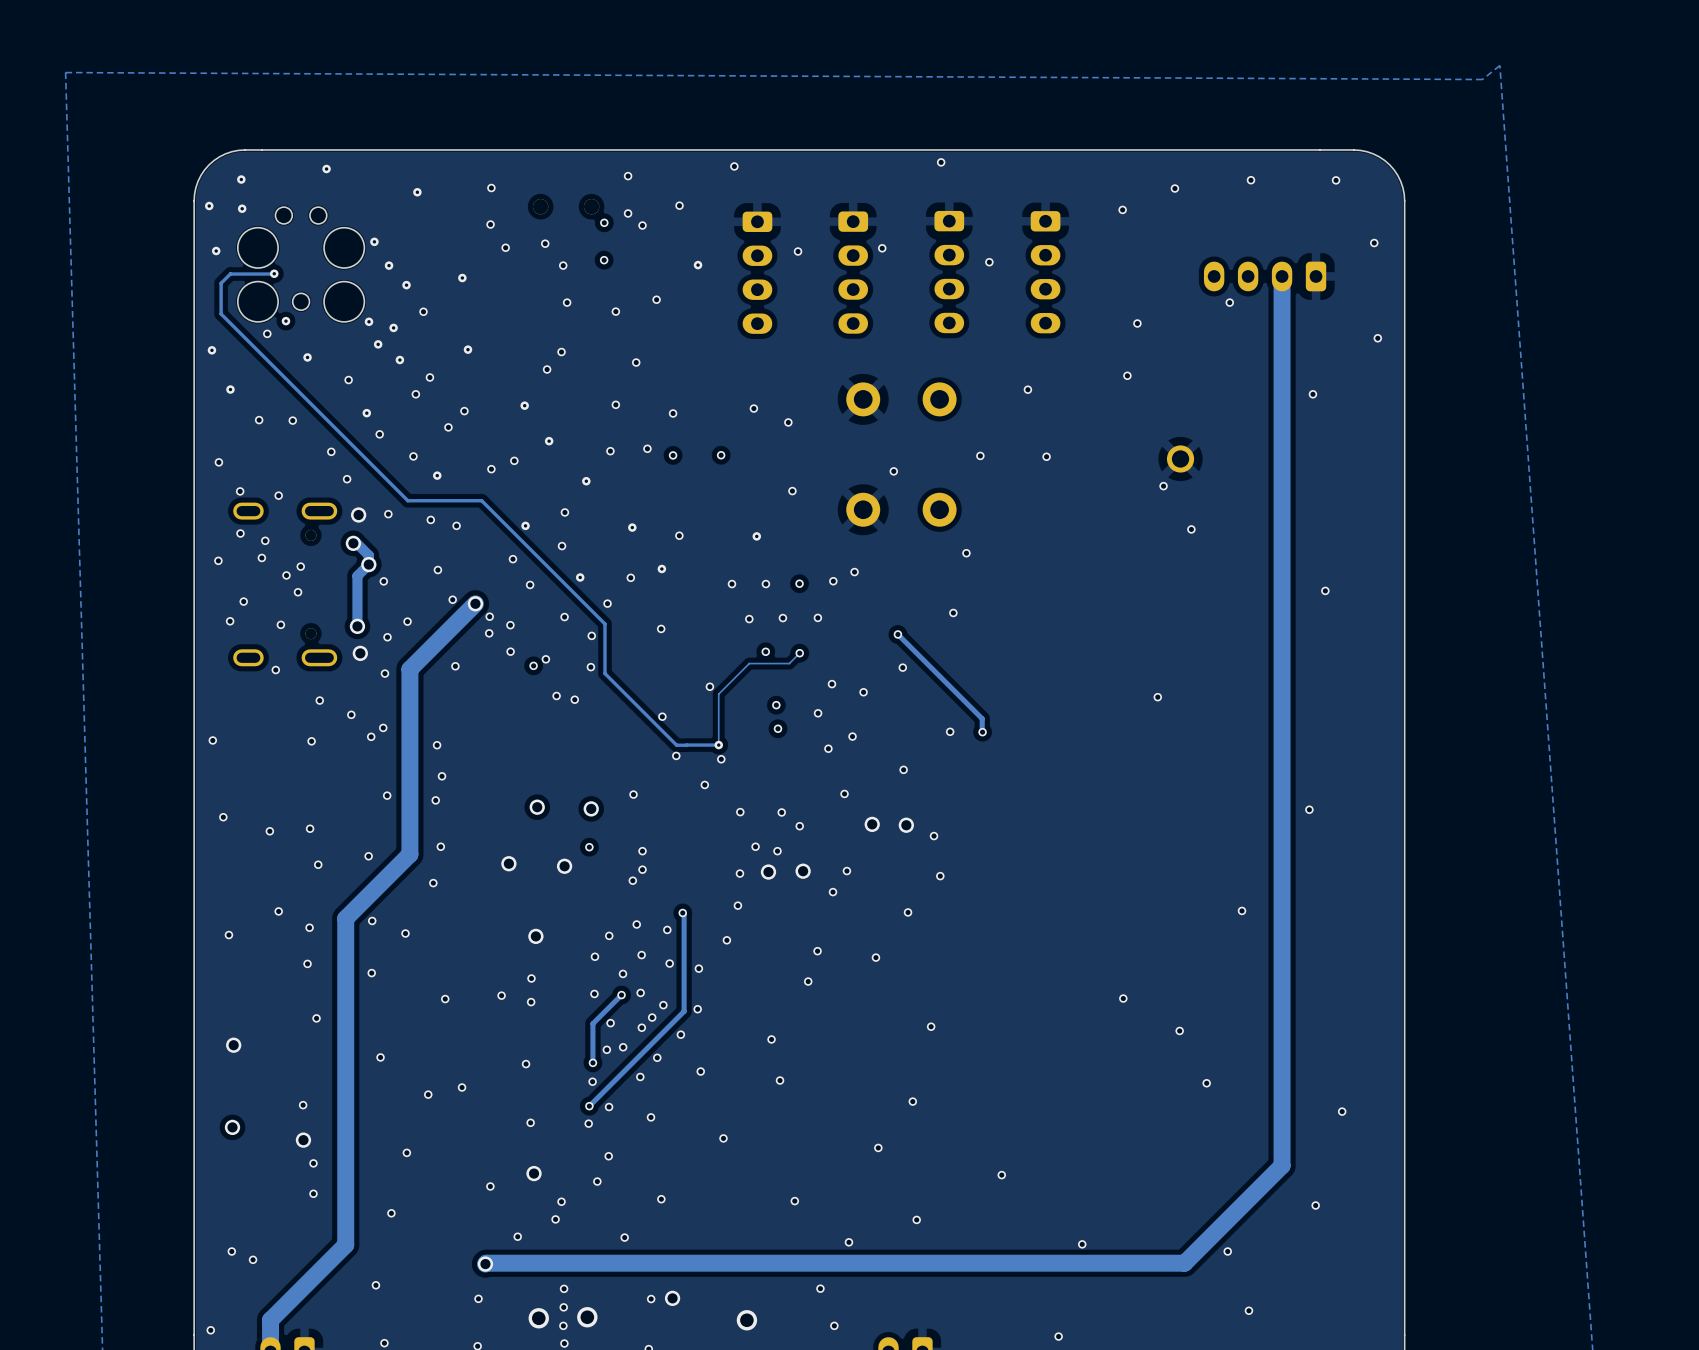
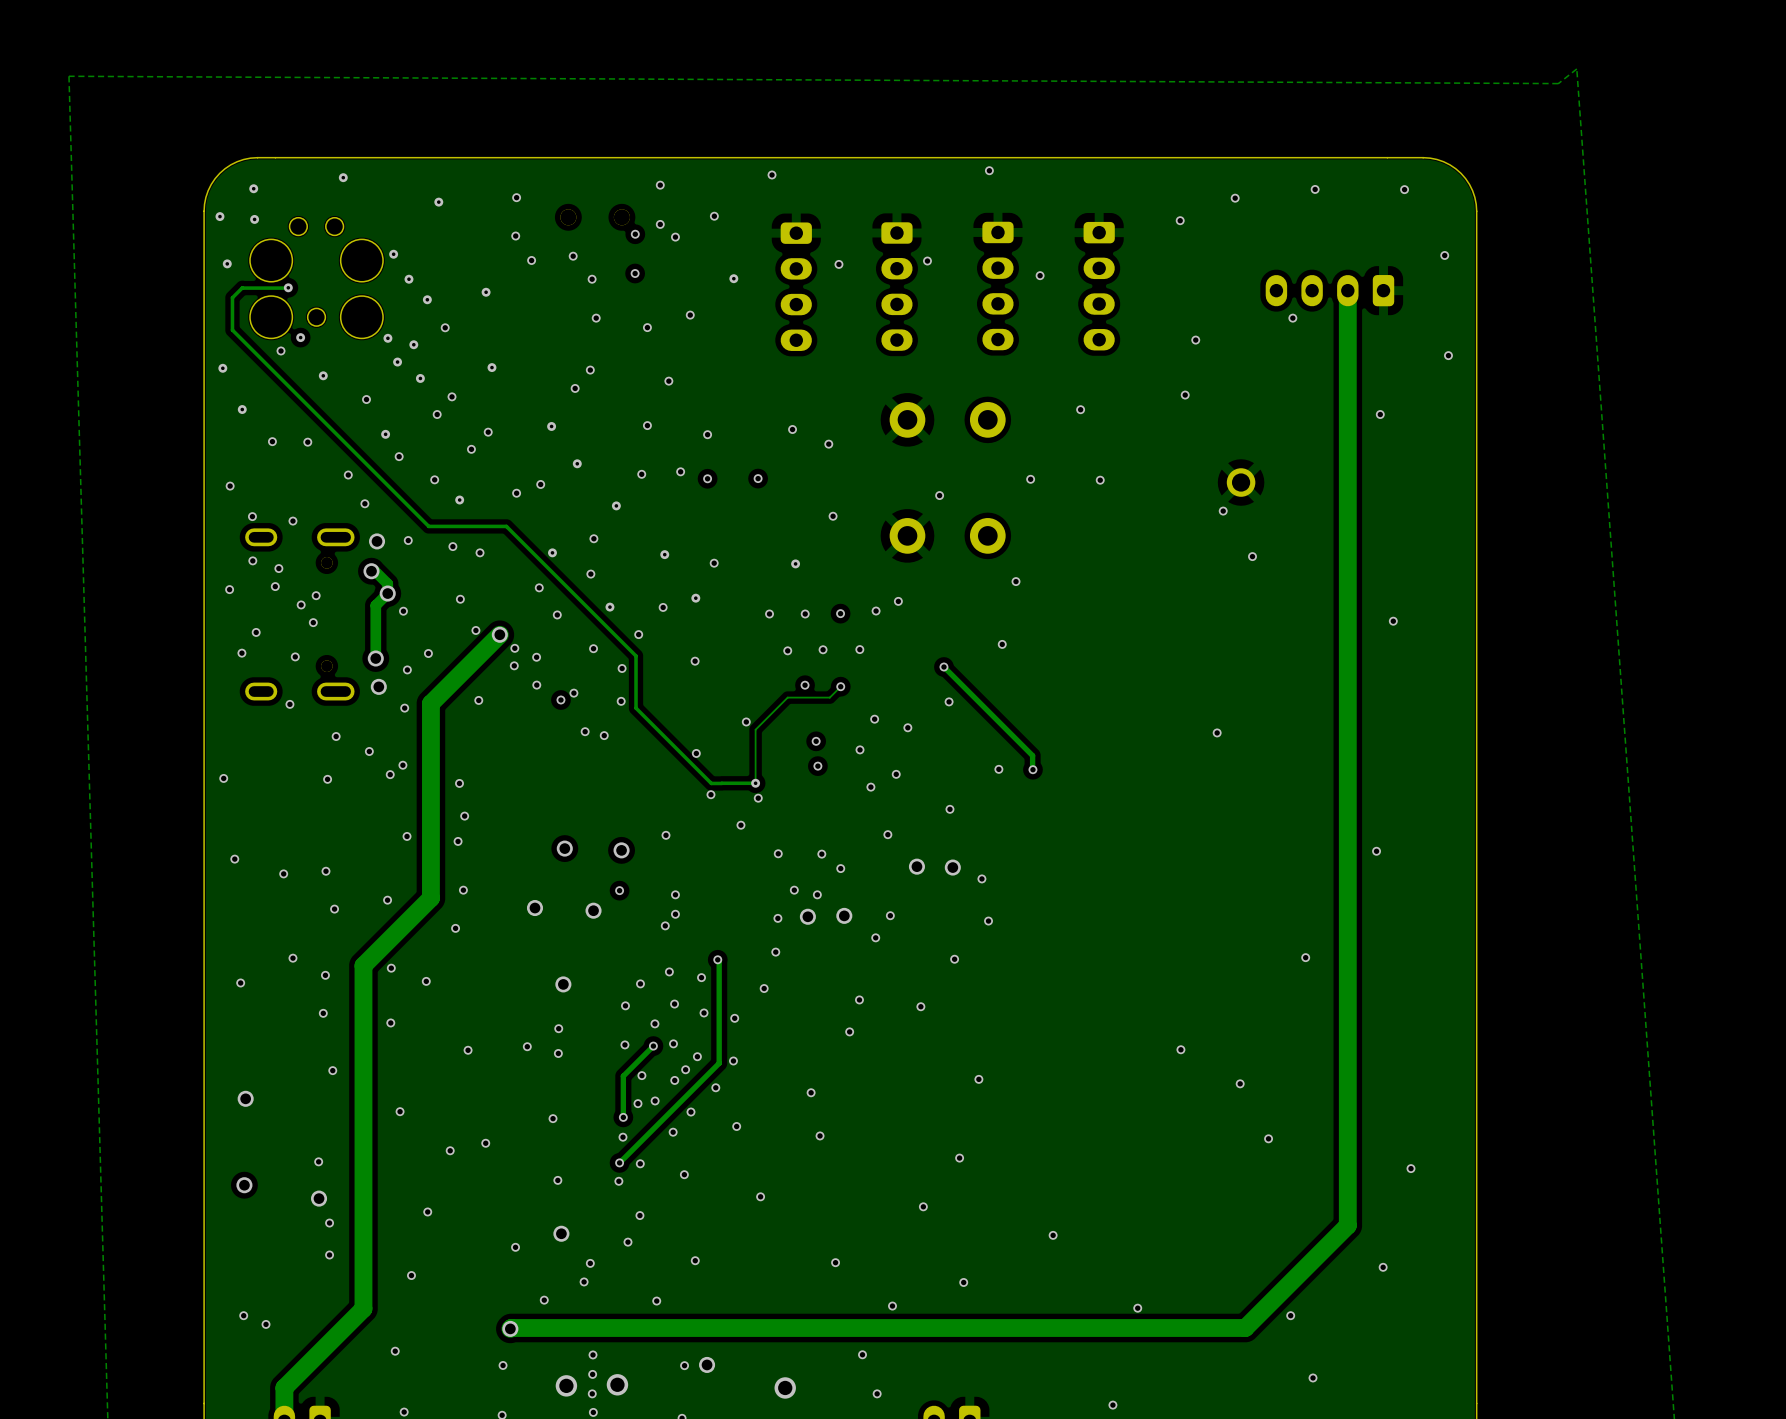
via: (210, 1330) -> none

